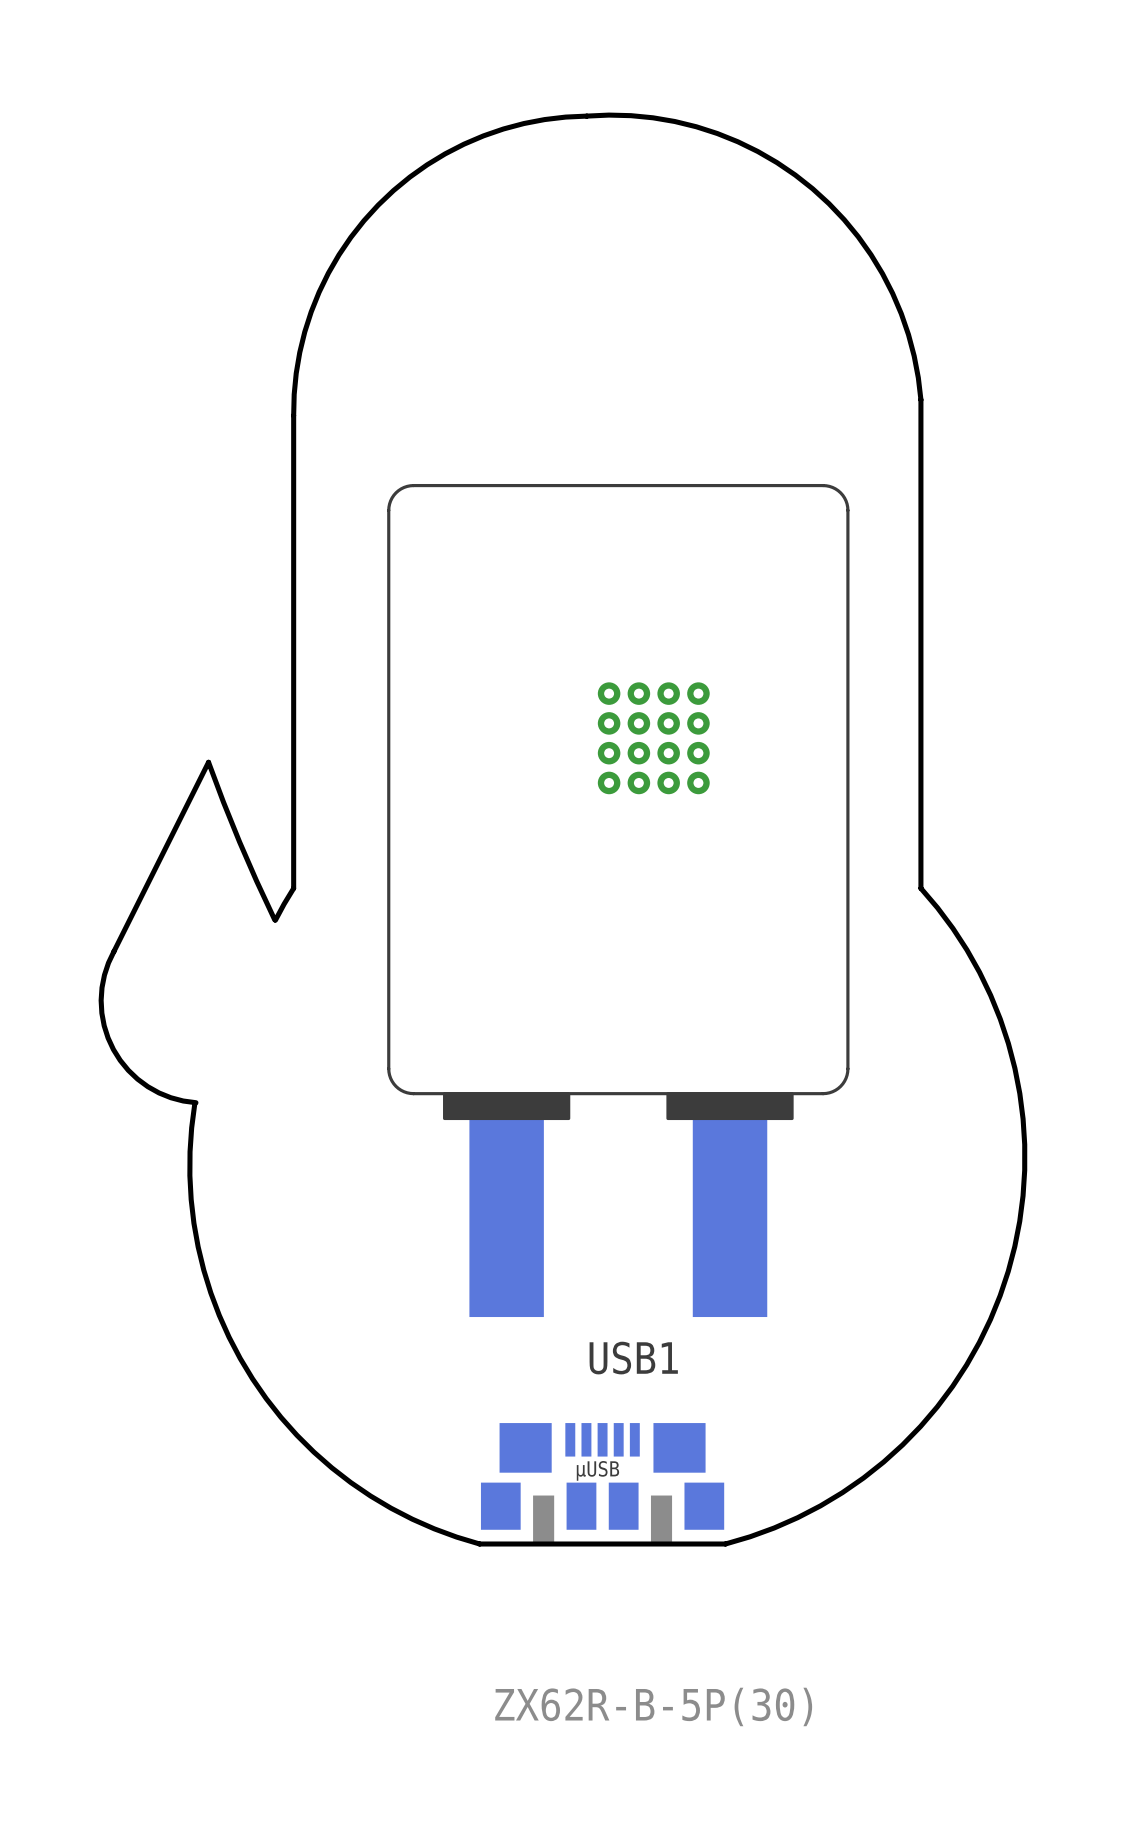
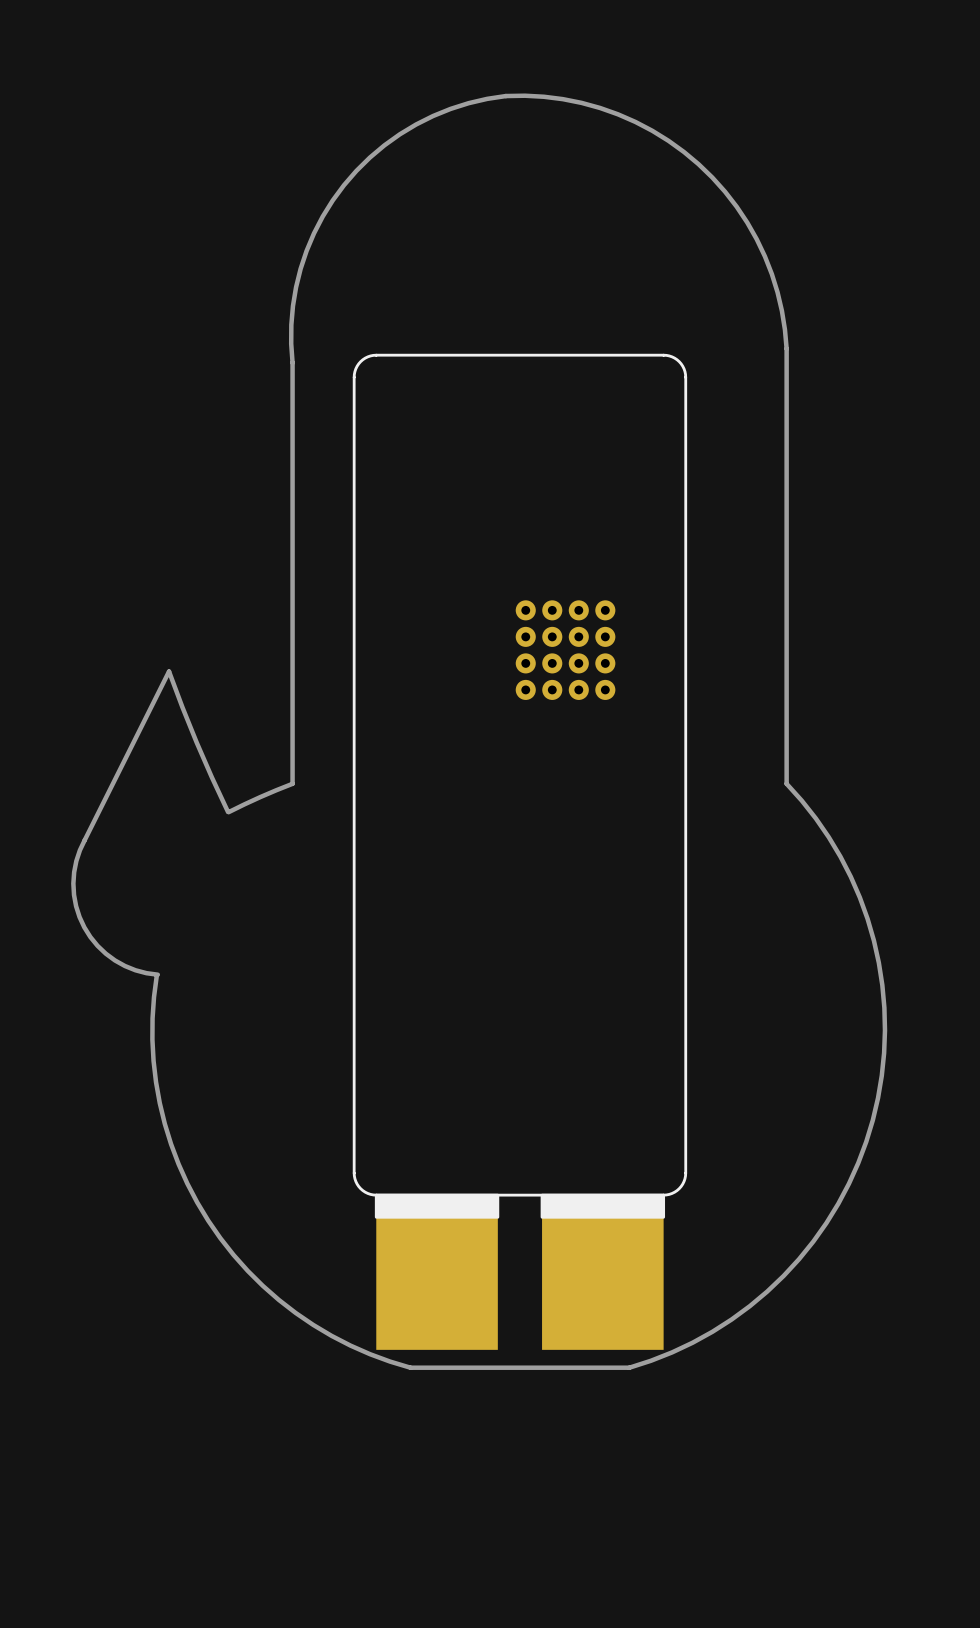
part: (618, 900) -> none
board edge: (275, 920) (293, 888) (293, 415) (296, 373) (299, 352) (311, 311) (328, 273) (350, 237) (363, 220) (393, 190) (409, 177) (445, 153) (483, 135) (523, 123) (544, 119) (608, 115) (631, 115) (674, 121) (717, 133) (737, 141) (776, 162) (795, 175) (812, 188) (844, 219) (871, 254) (892, 293) (901, 313) (914, 356) (920, 399) (920, 888) (952, 928) (966, 949) (990, 995) (1000, 1019) (1008, 1043) (1019, 1093) (1023, 1119) (1024, 1170) (1023, 1195) (1014, 1246) (1000, 1295) (979, 1342) (966, 1364) (937, 1406) (902, 1444) (863, 1477) (842, 1492) (797, 1517) (774, 1527) (725, 1544) -> (228, 812) (292, 783) (291, 324) (300, 268) (313, 233) (332, 200) (356, 170) (399, 134) (433, 116) (487, 98) (524, 95) (581, 102) (617, 114) (668, 140) (712, 177) (736, 206) (764, 256) (777, 292) (786, 348) (786, 783) (828, 837) (859, 897) (878, 962) (884, 1030) (881, 1075) (866, 1141) (848, 1183) (813, 1241) (783, 1275) (731, 1319) (672, 1352) (629, 1367)
part: none -> (519, 851)
USB1: ZX62R-B-5P(30) (602, 1482) -> none

